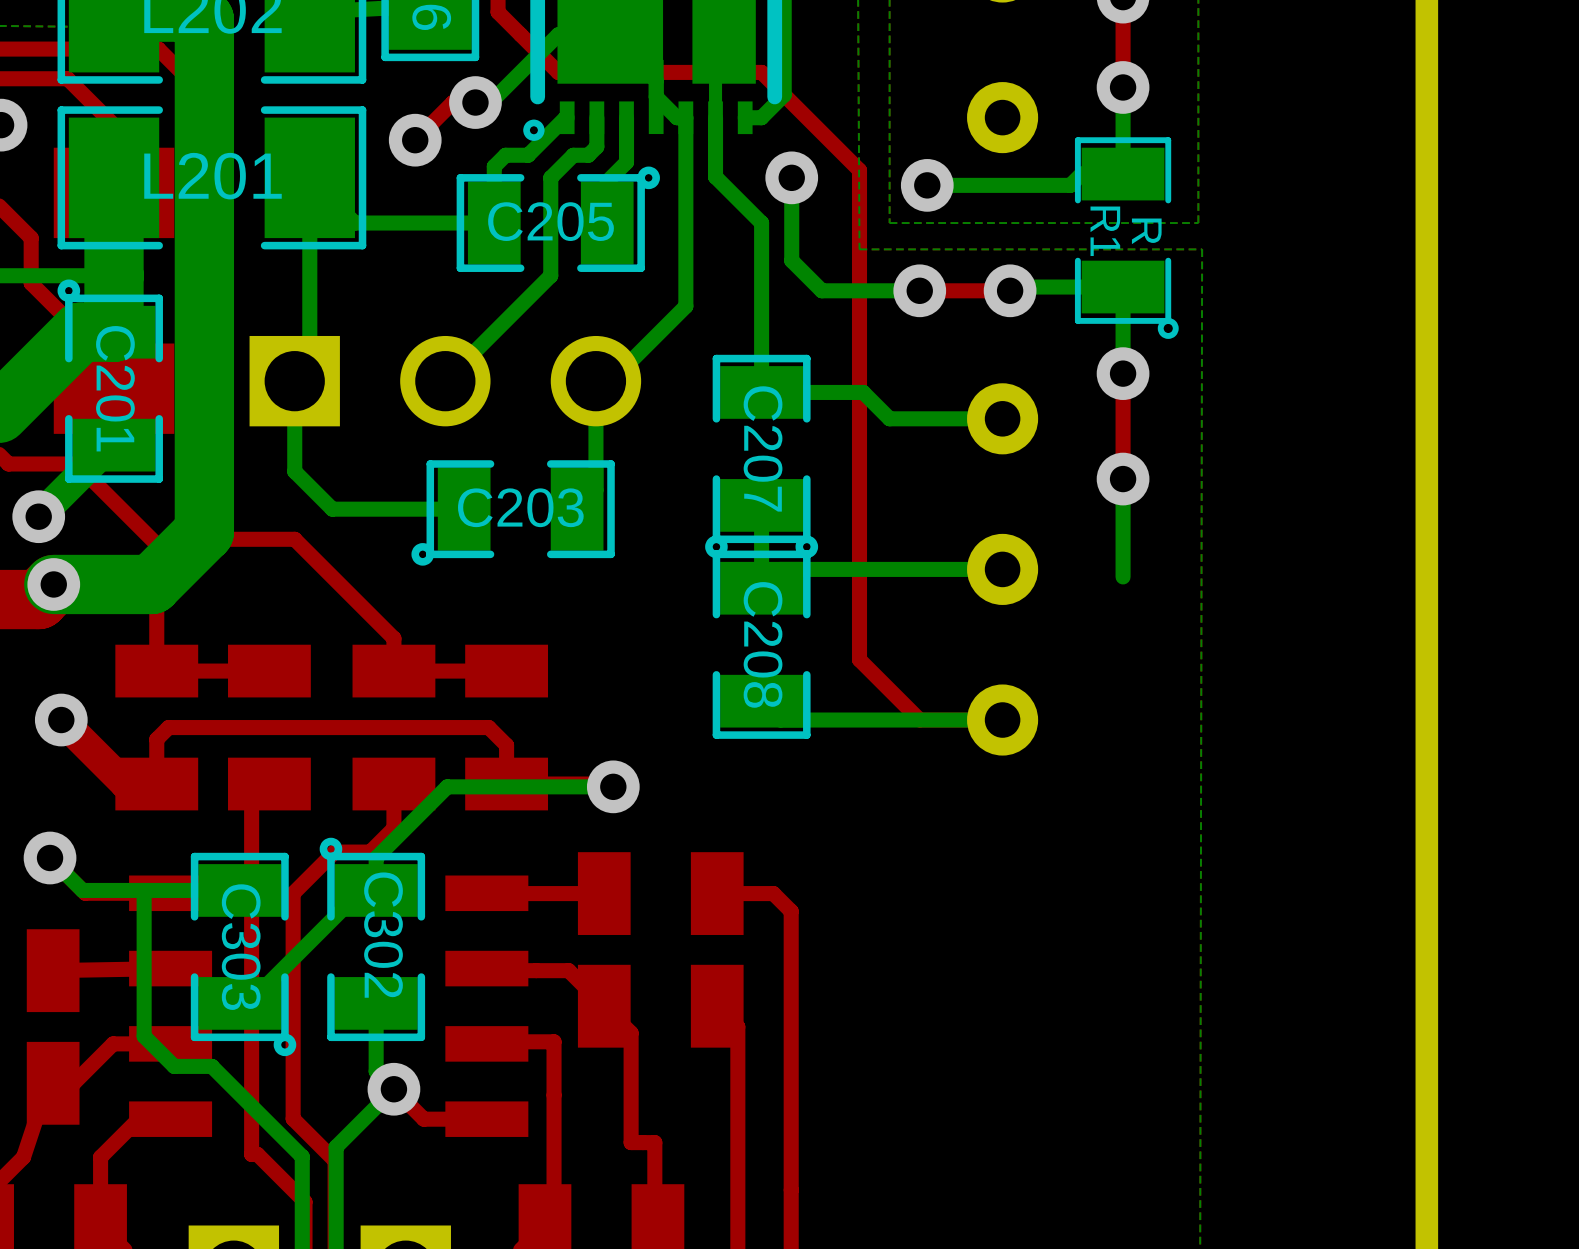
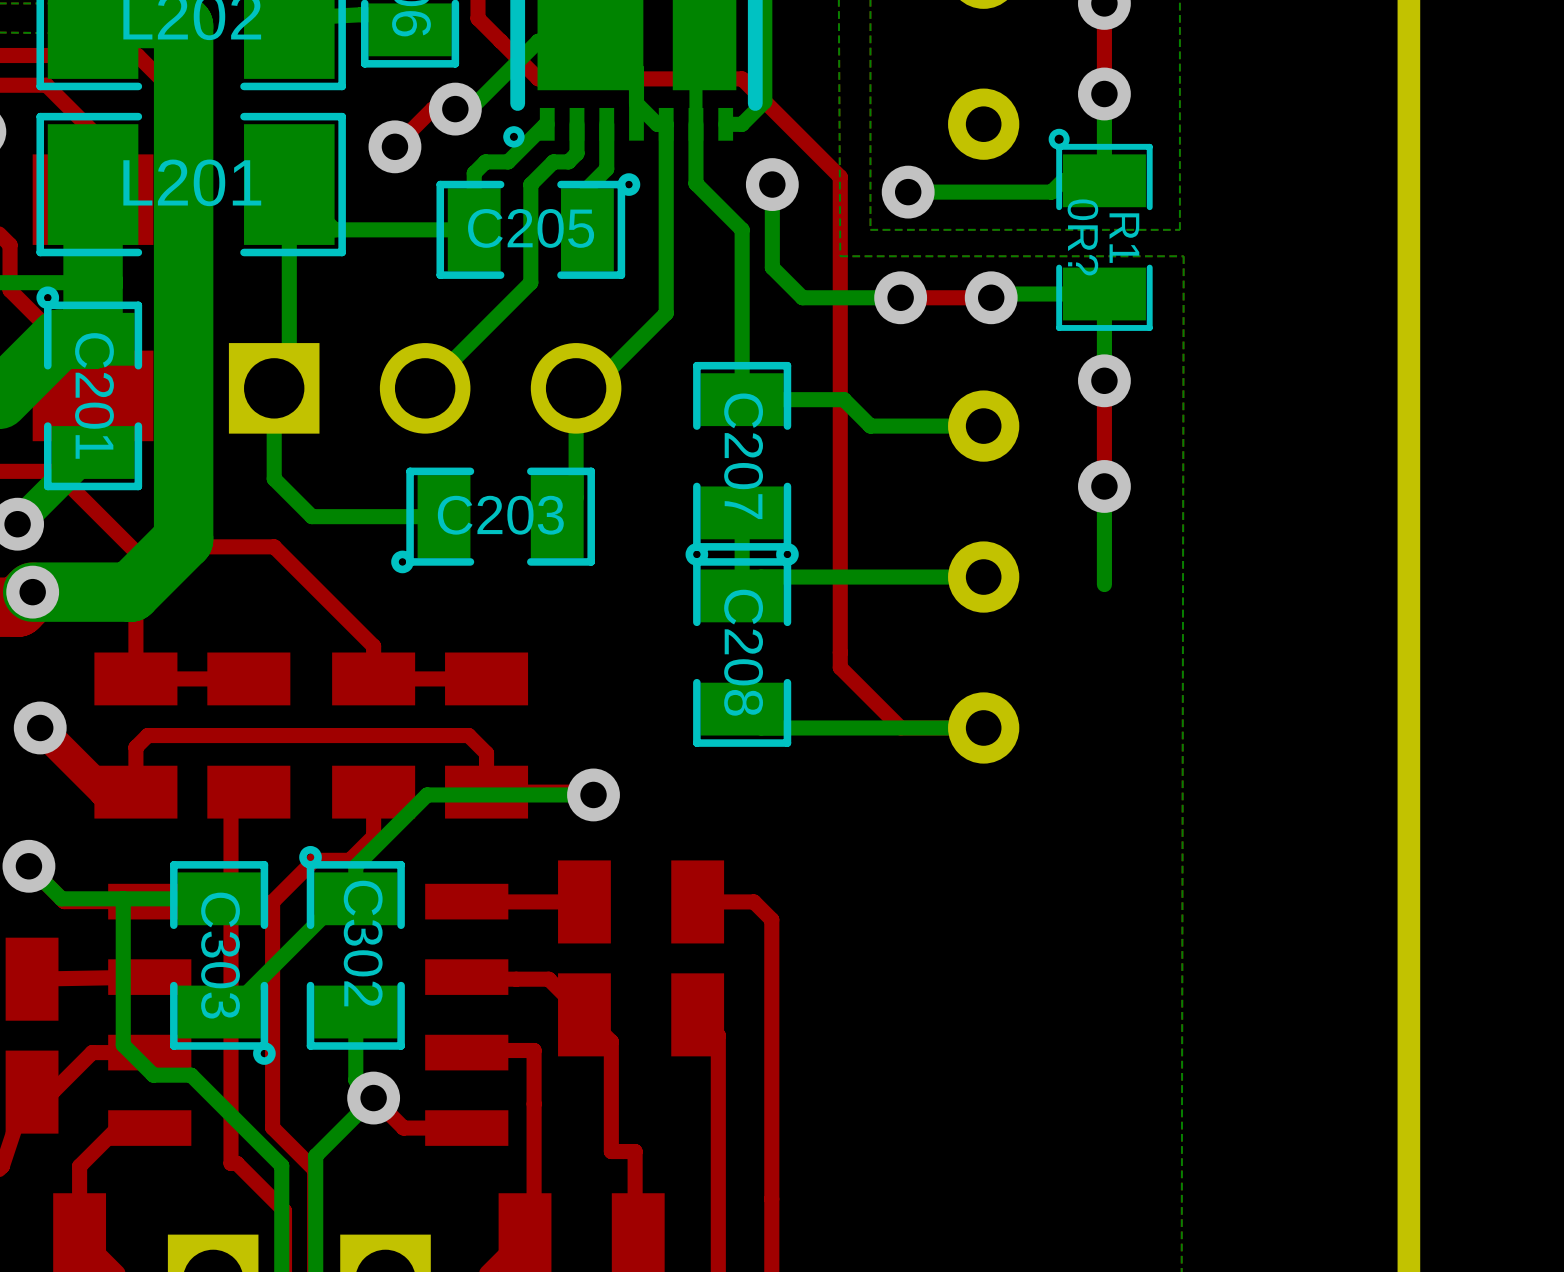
R1 value: R (1146, 231) -> 0R? (1082, 237)
R1 rotation: 0° (1126, 238) -> 180° (1100, 229)

